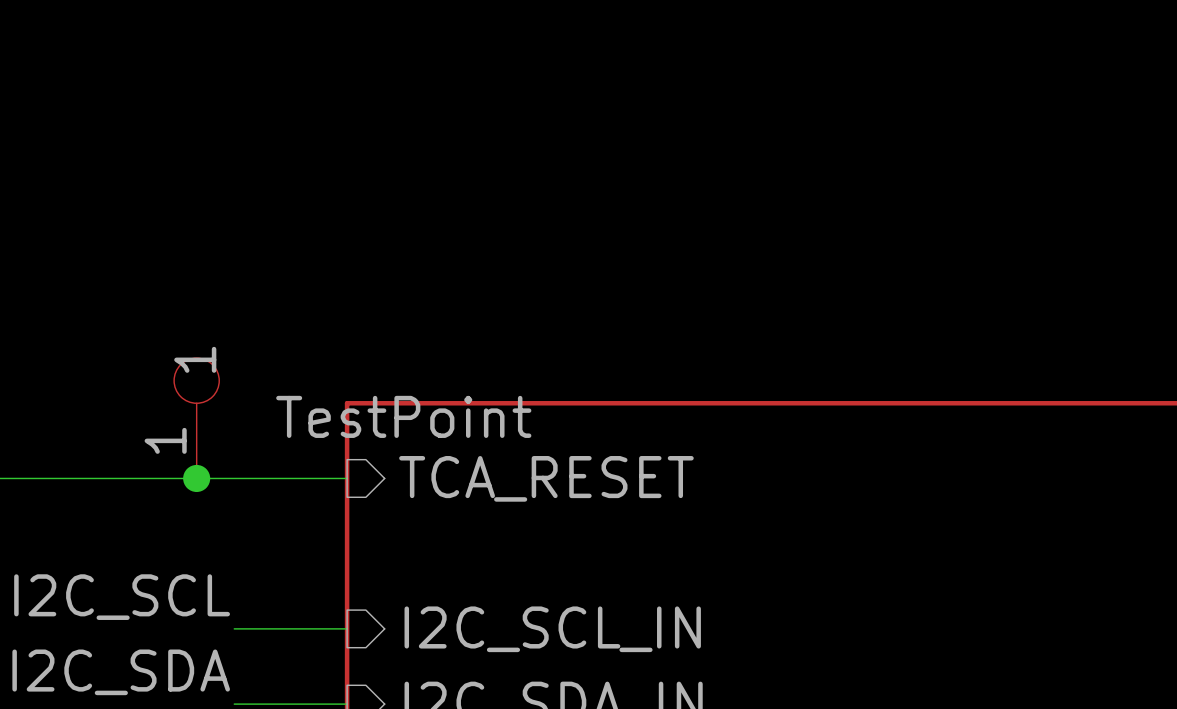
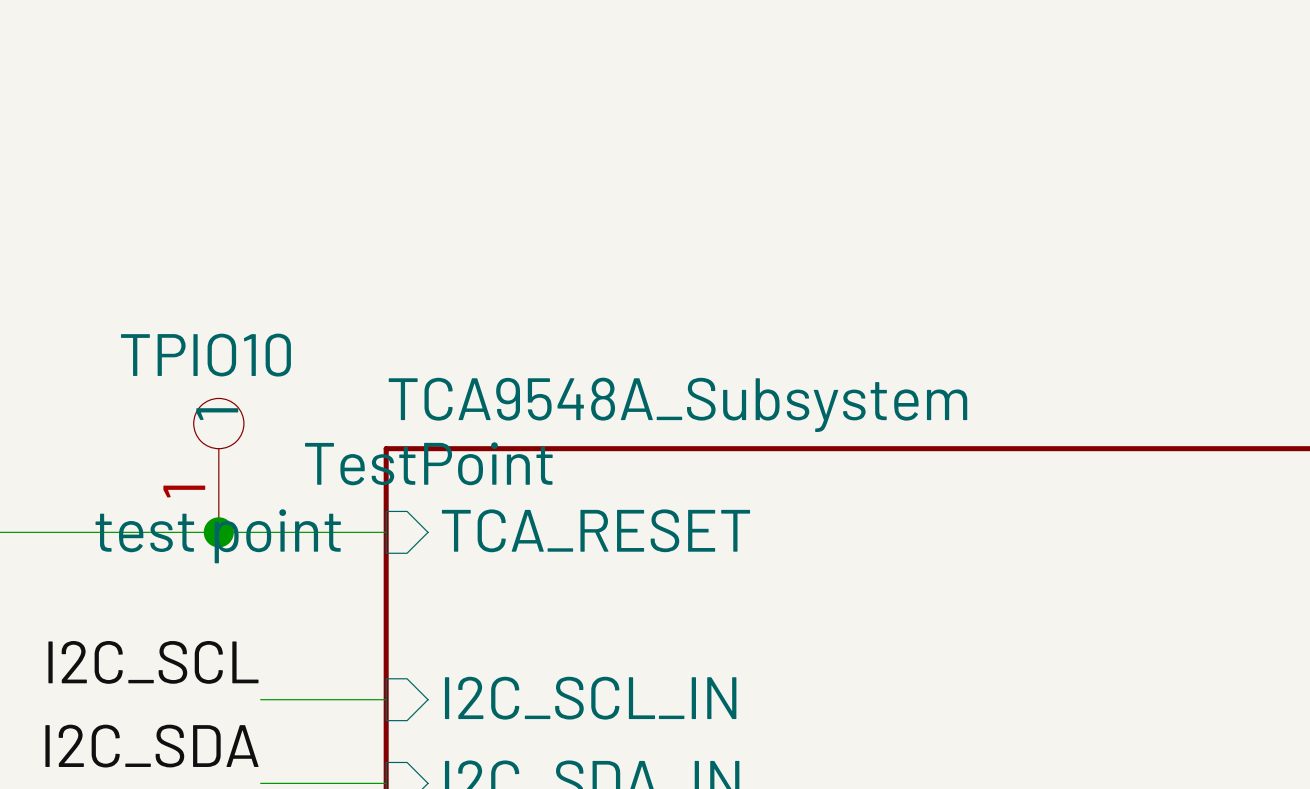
TPIO10 name: none -> TPIO10 (205, 355)
sheet TCA9548A_Subsystem name: none -> TCA9548A_Subsystem (677, 404)
TPIO10 text: none -> test point (218, 536)

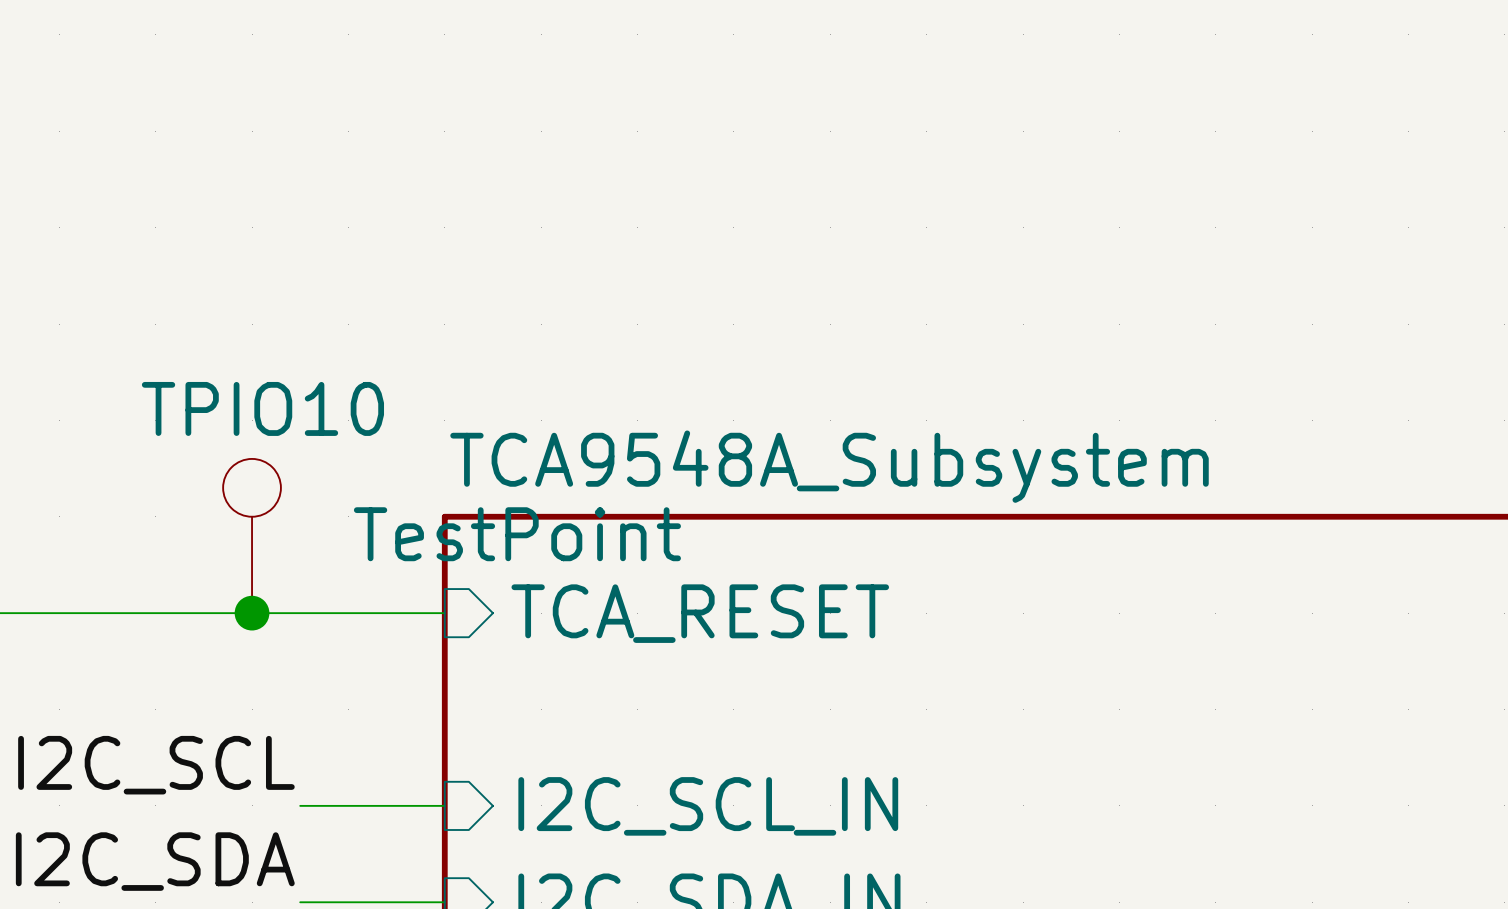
TPIO10 pin name: 1 (217, 414) -> none
TPIO10 pin number: 1 (184, 491) -> none
TPIO10 text: test point (218, 536) -> none

